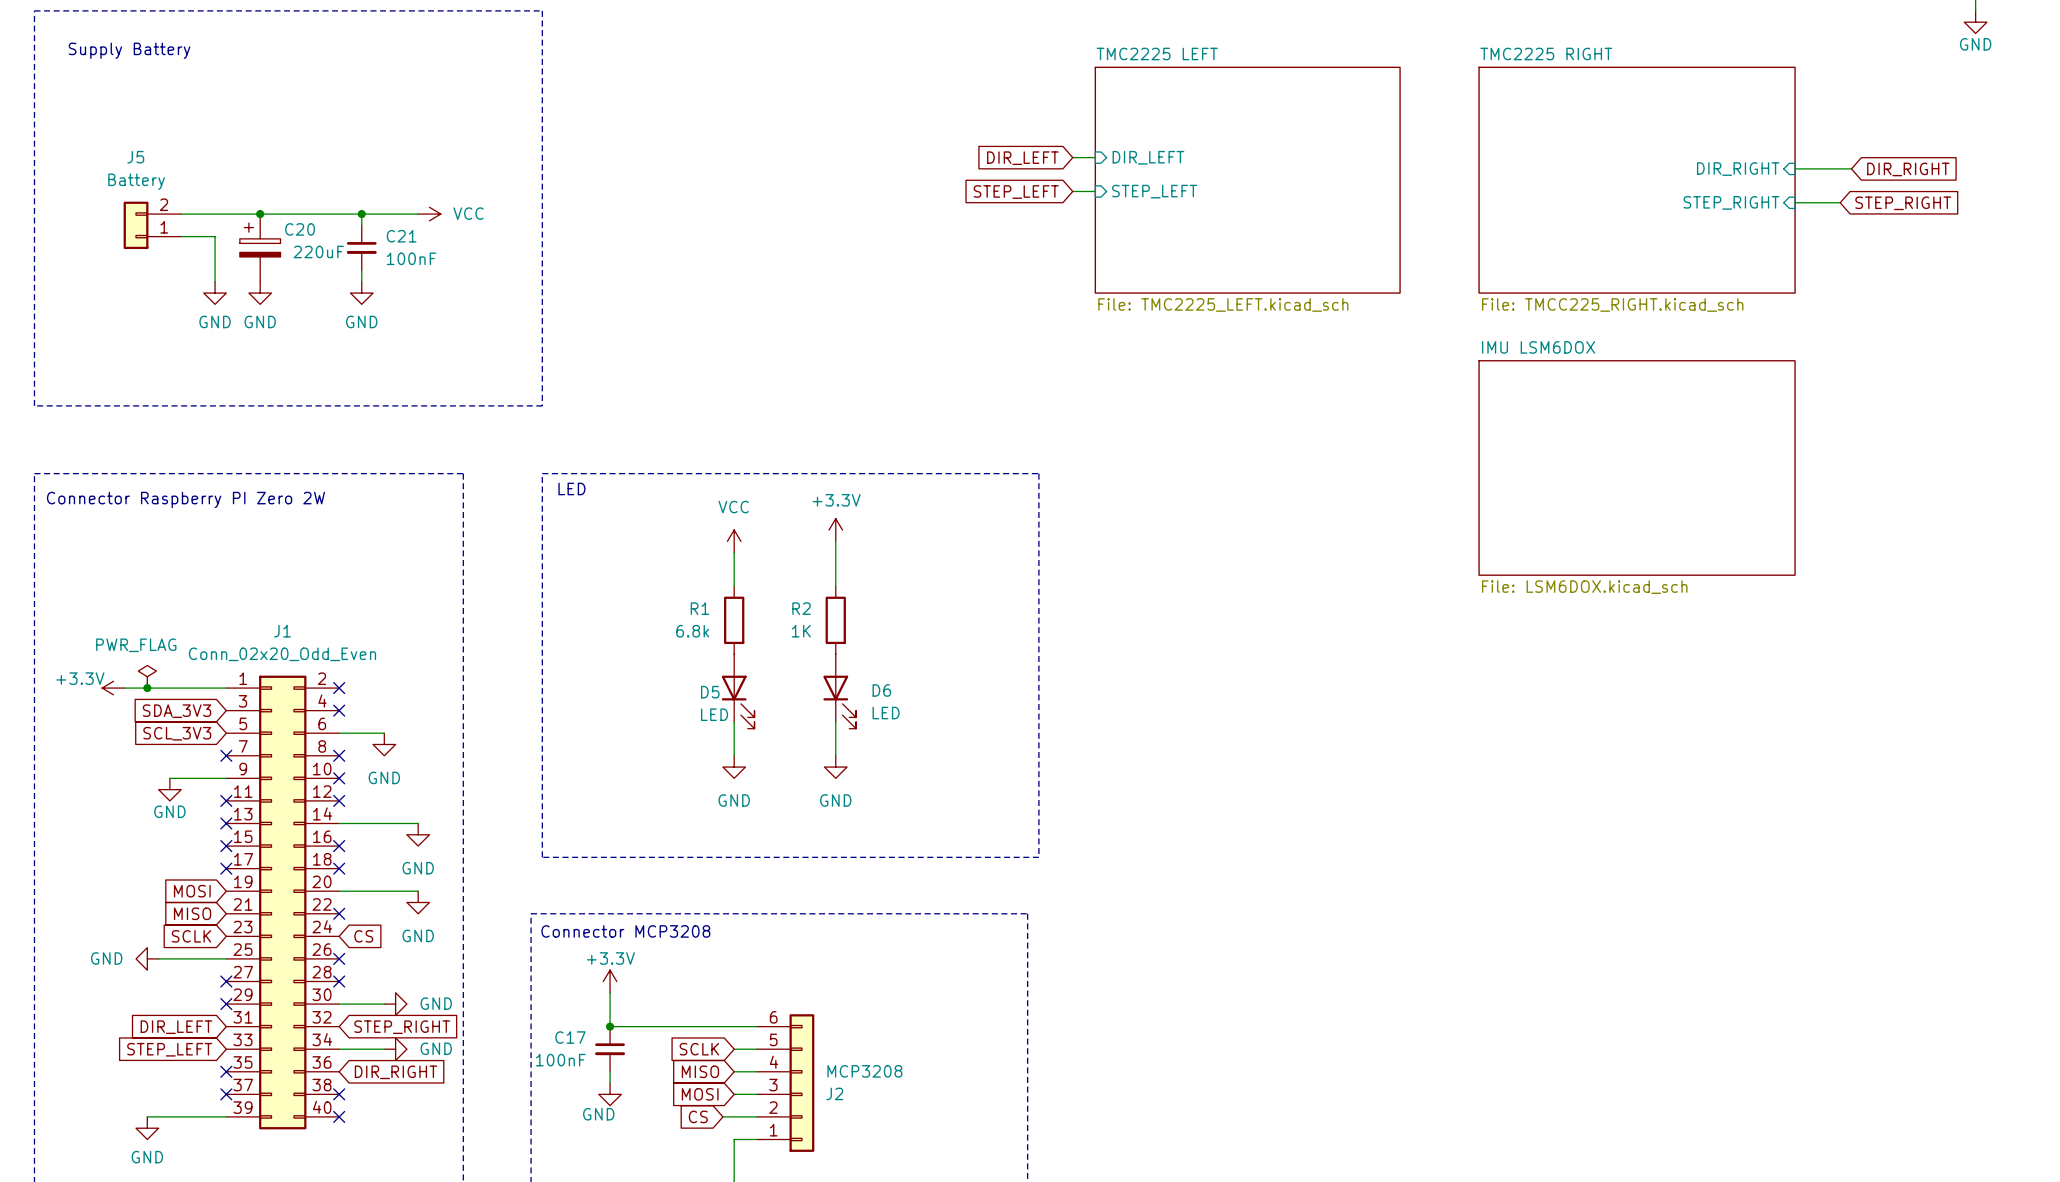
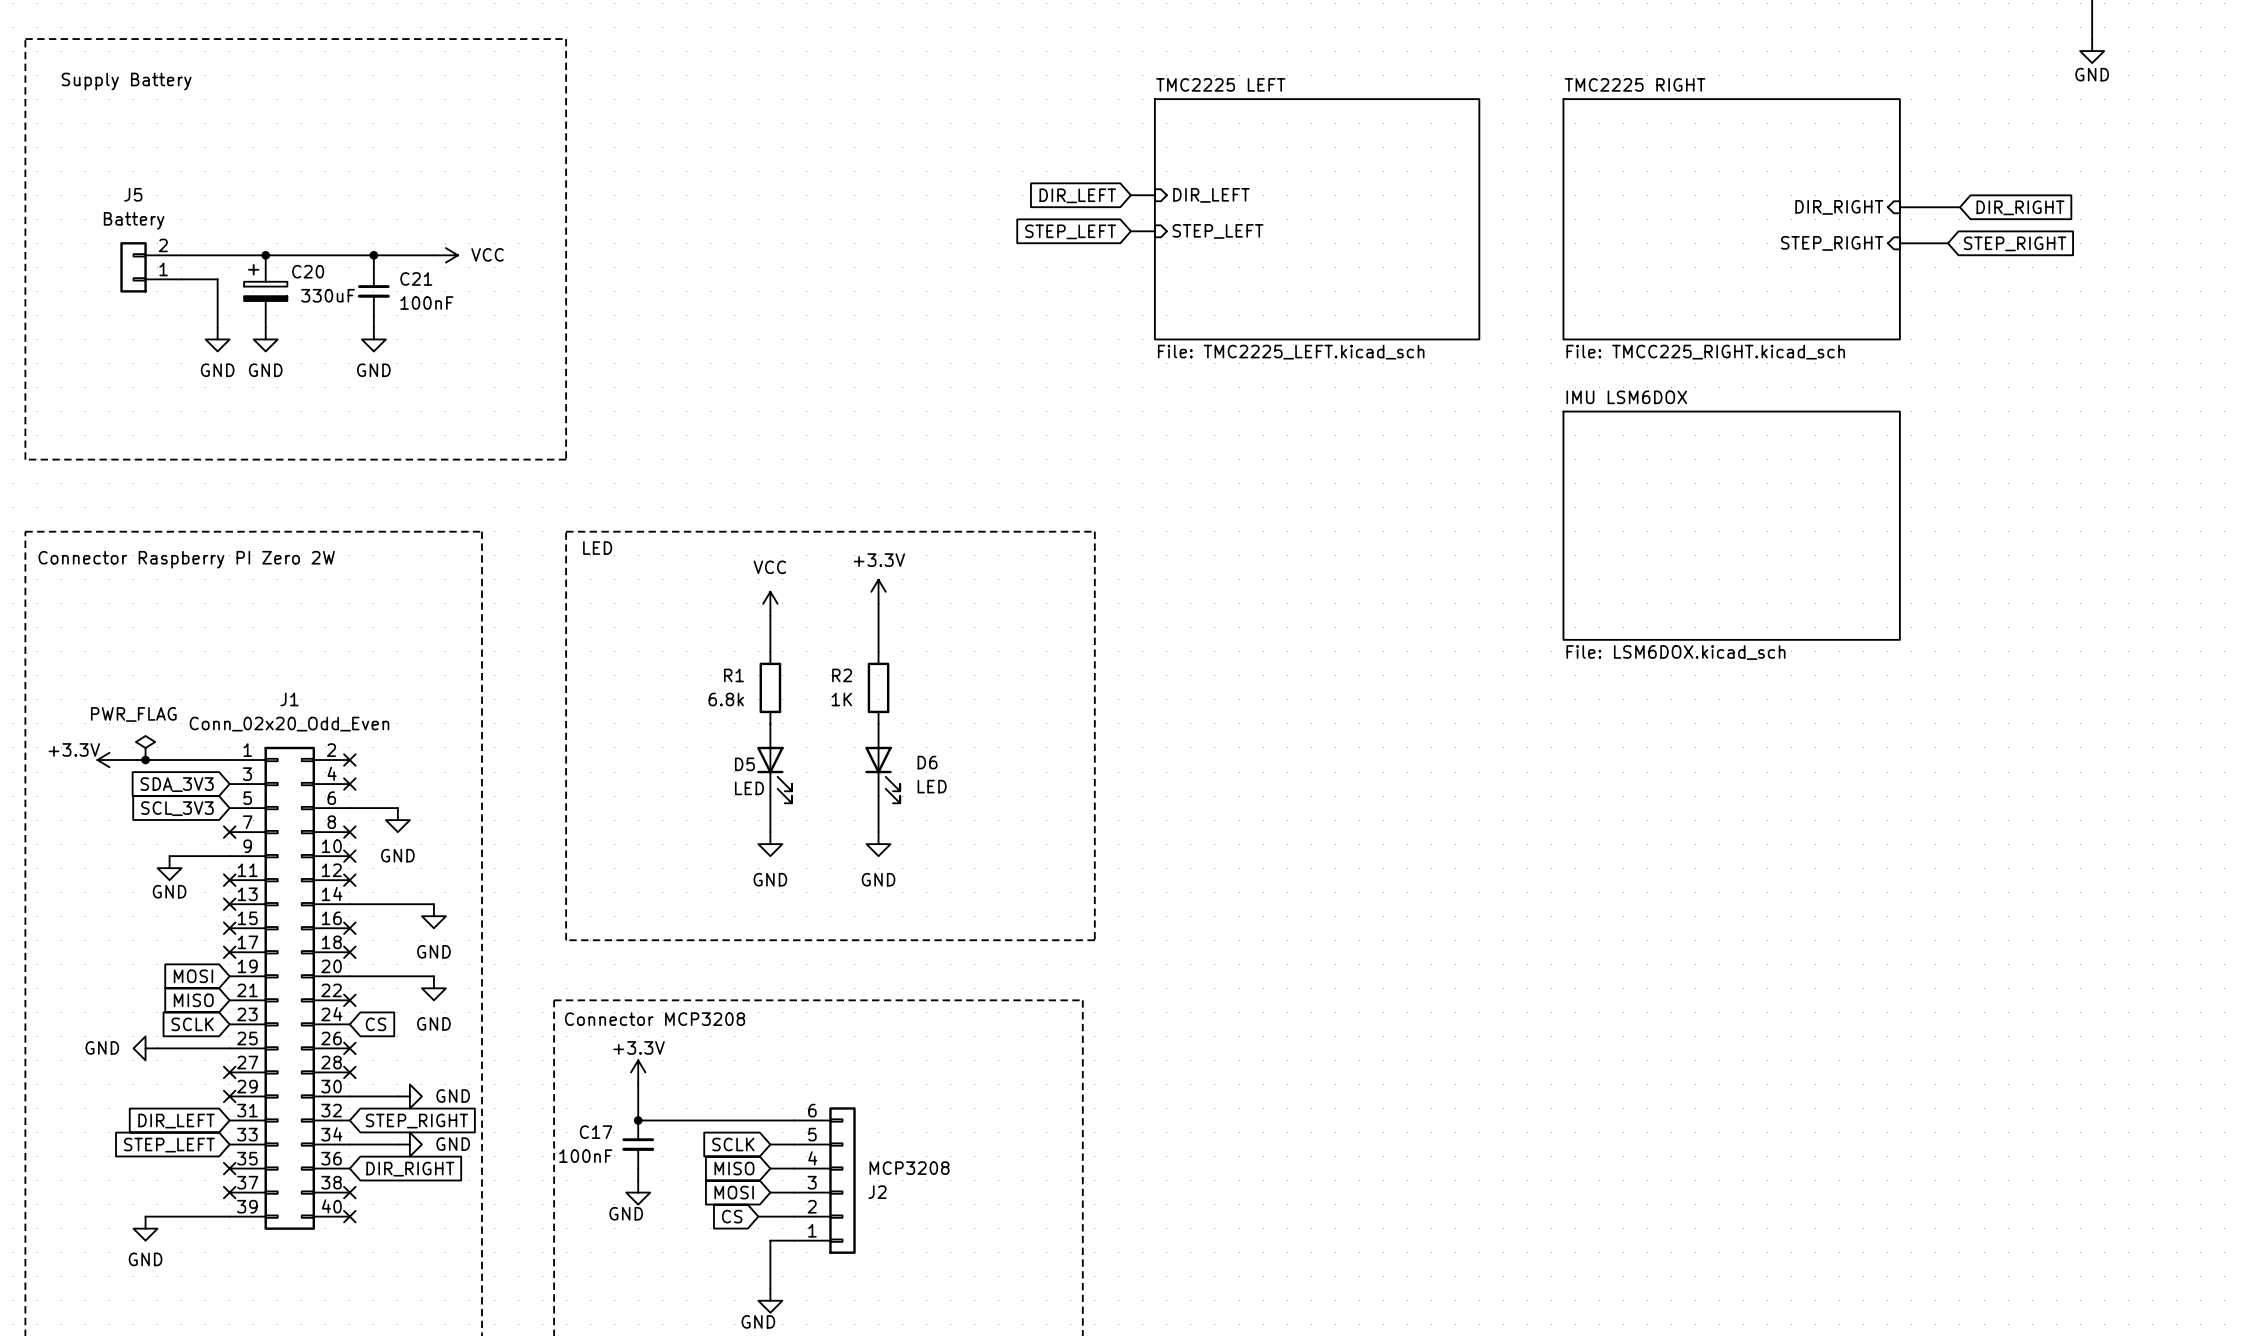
C20 value: 220uF (318, 252) -> 330uF (328, 295)

